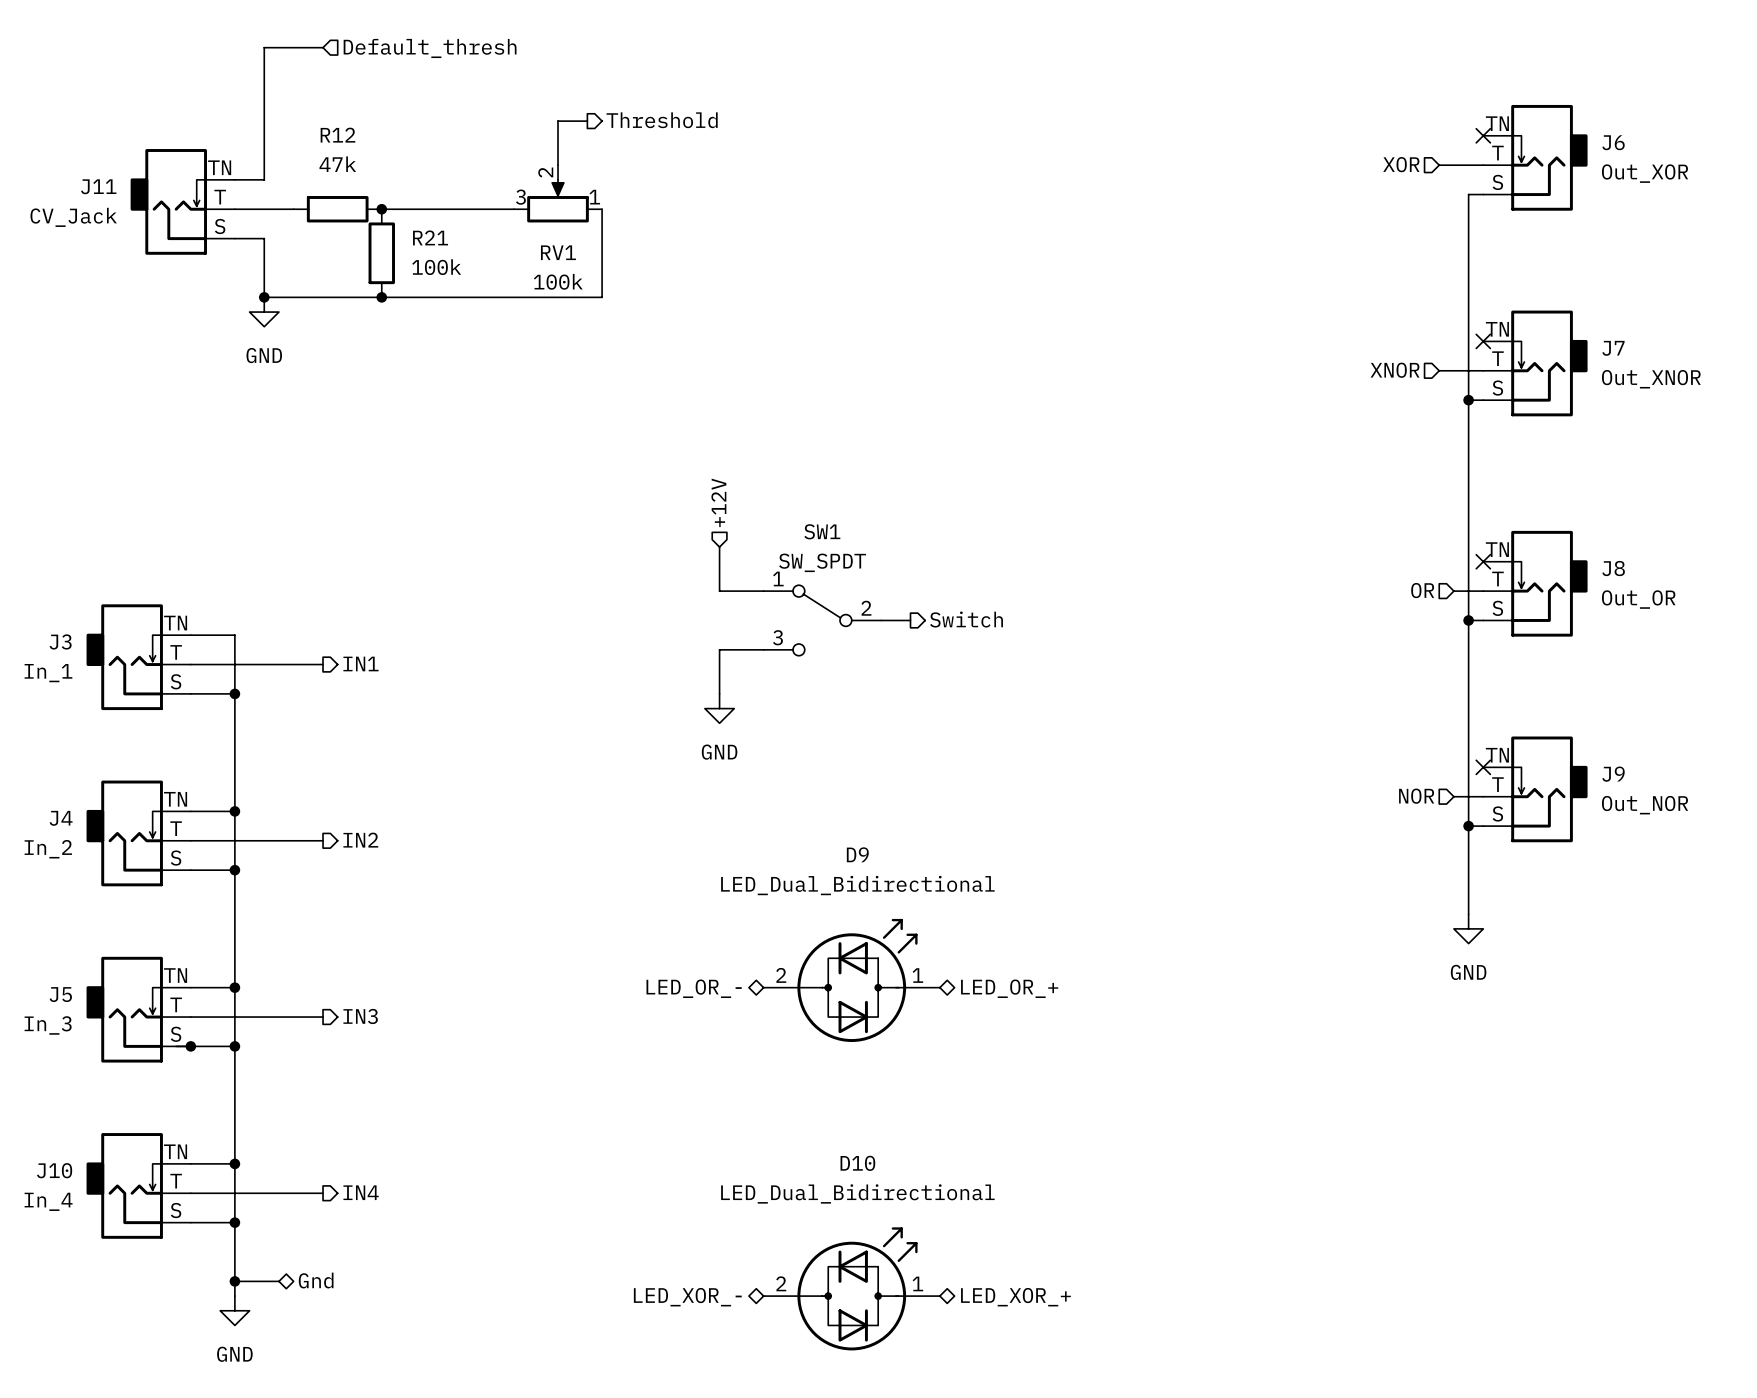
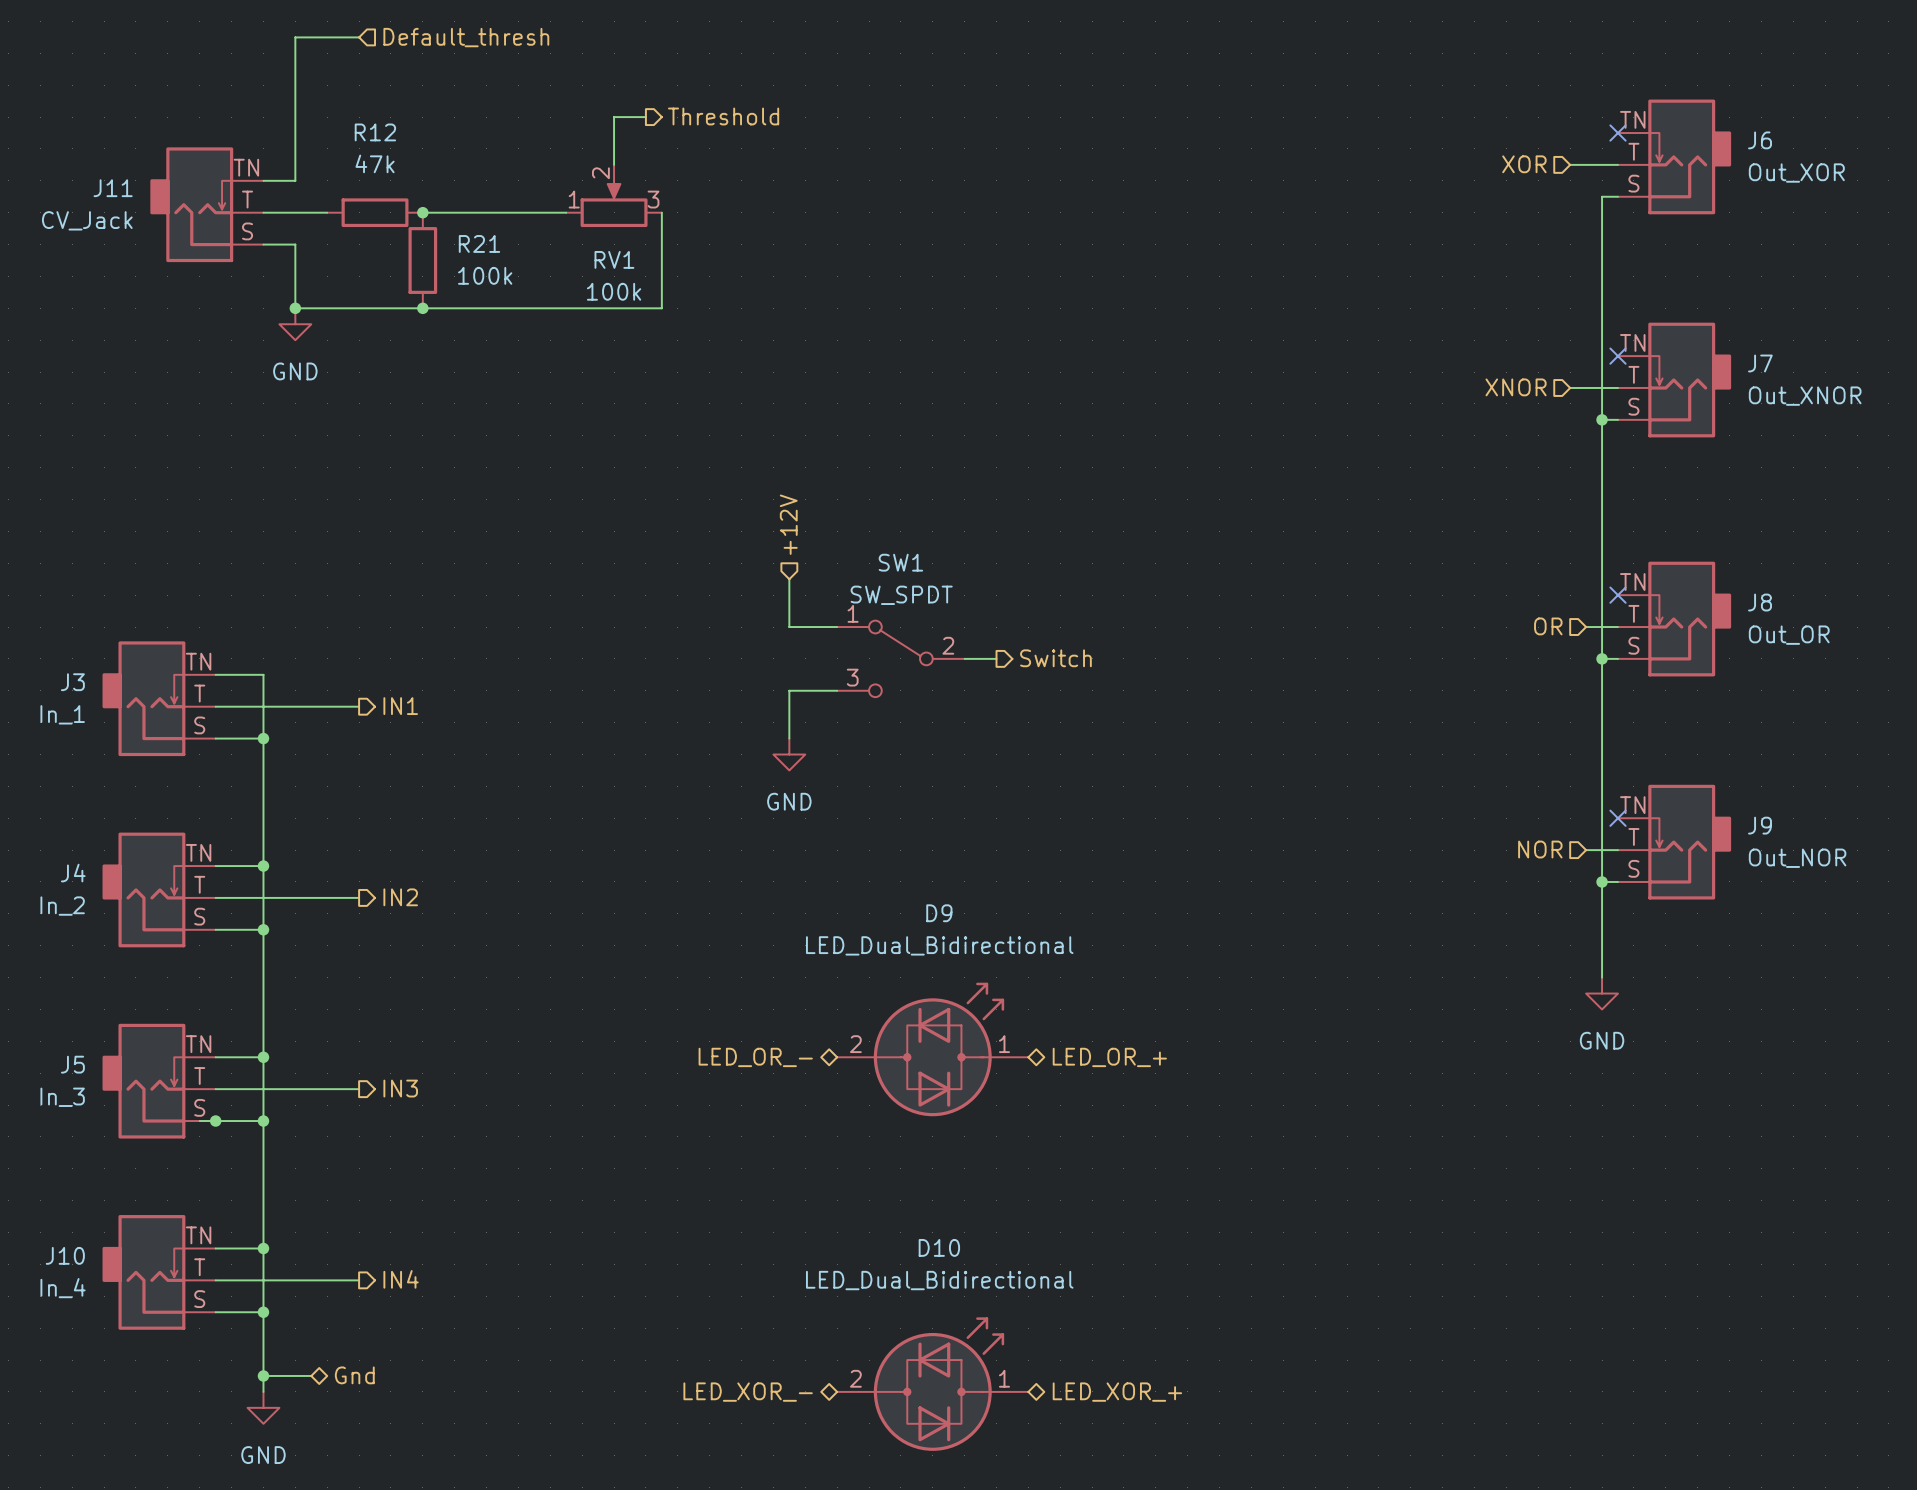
RV1 flip: as is (558, 201) -> left-right (614, 203)

